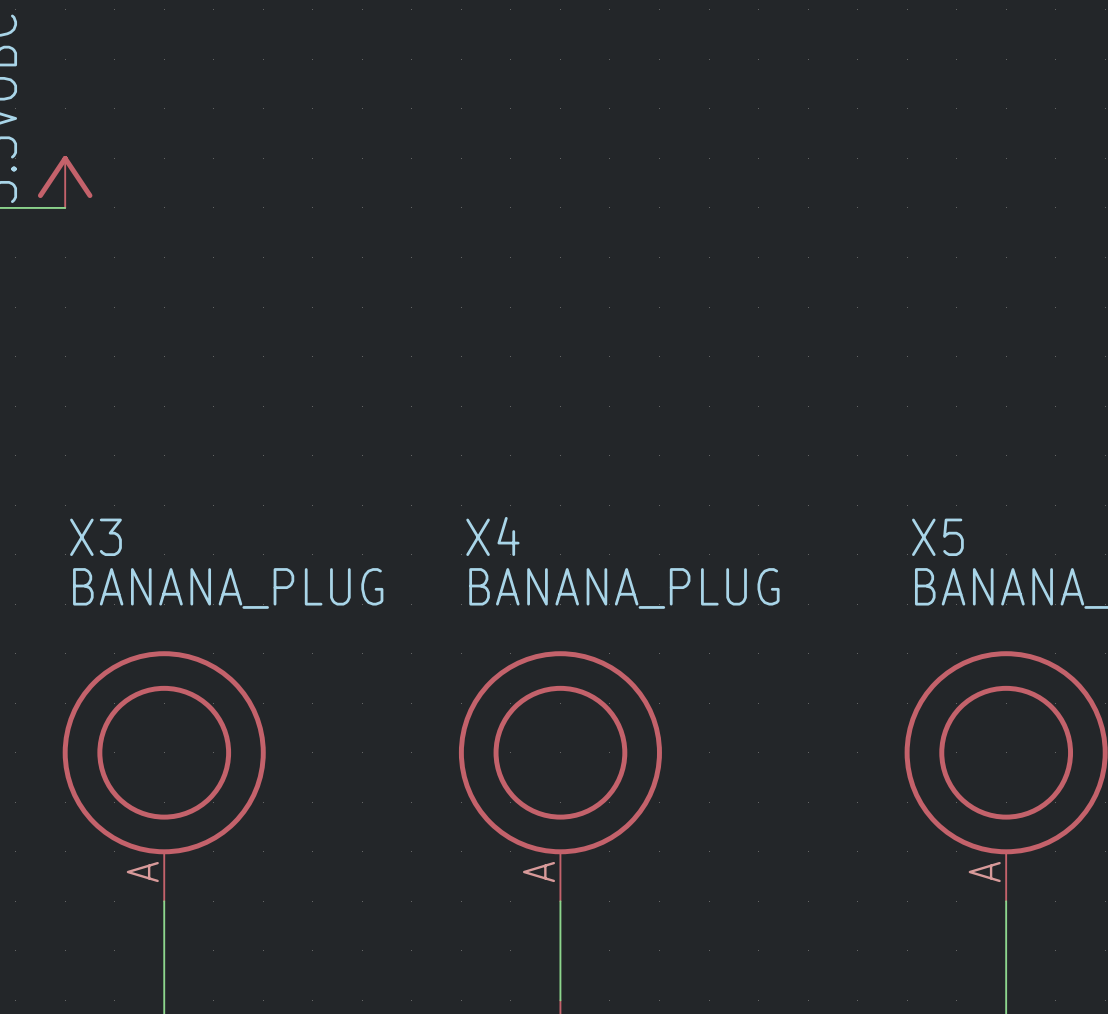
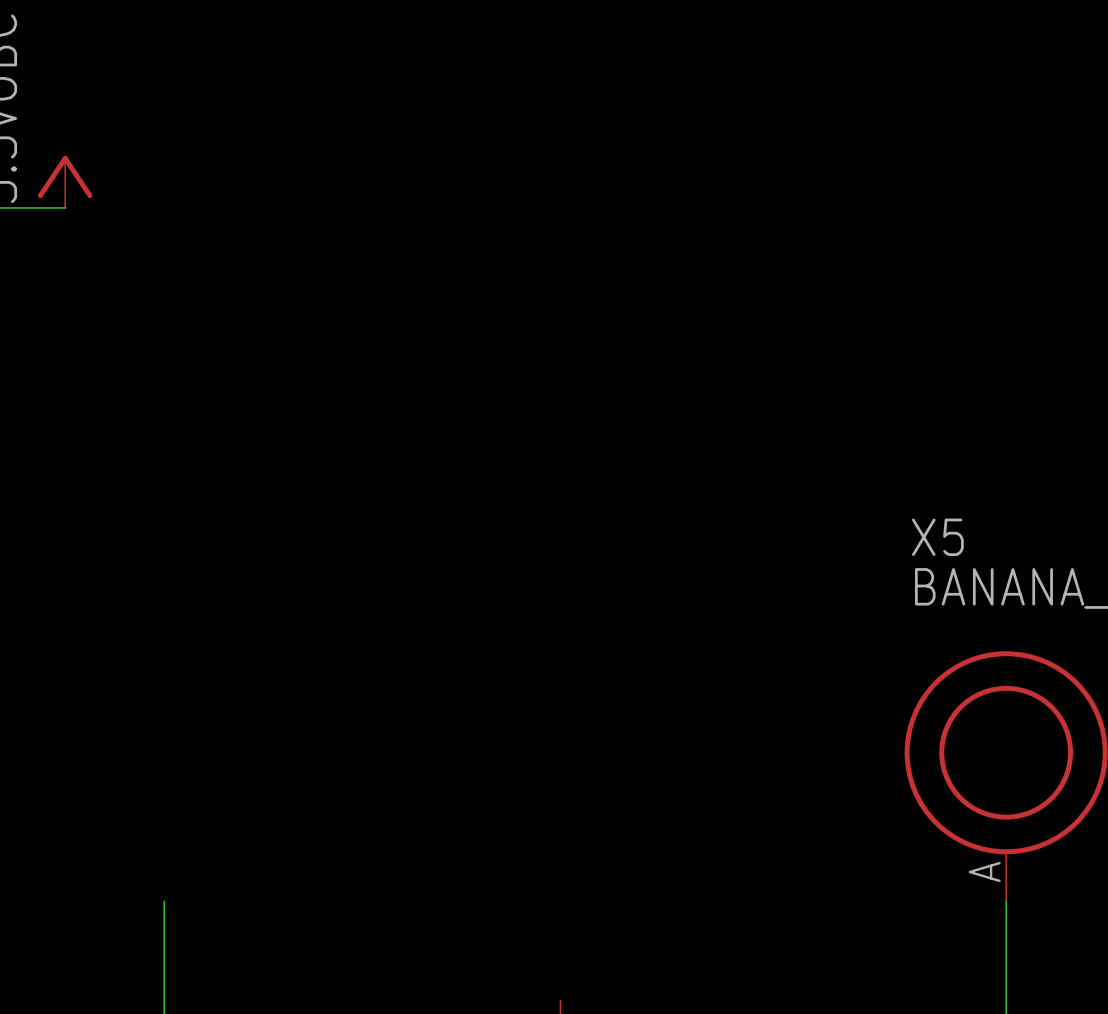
X3: BANANA_PLUG (164, 776) -> none
X4: BANANA_PLUG (560, 776) -> none
wire: (560, 901) (560, 1000) -> none

